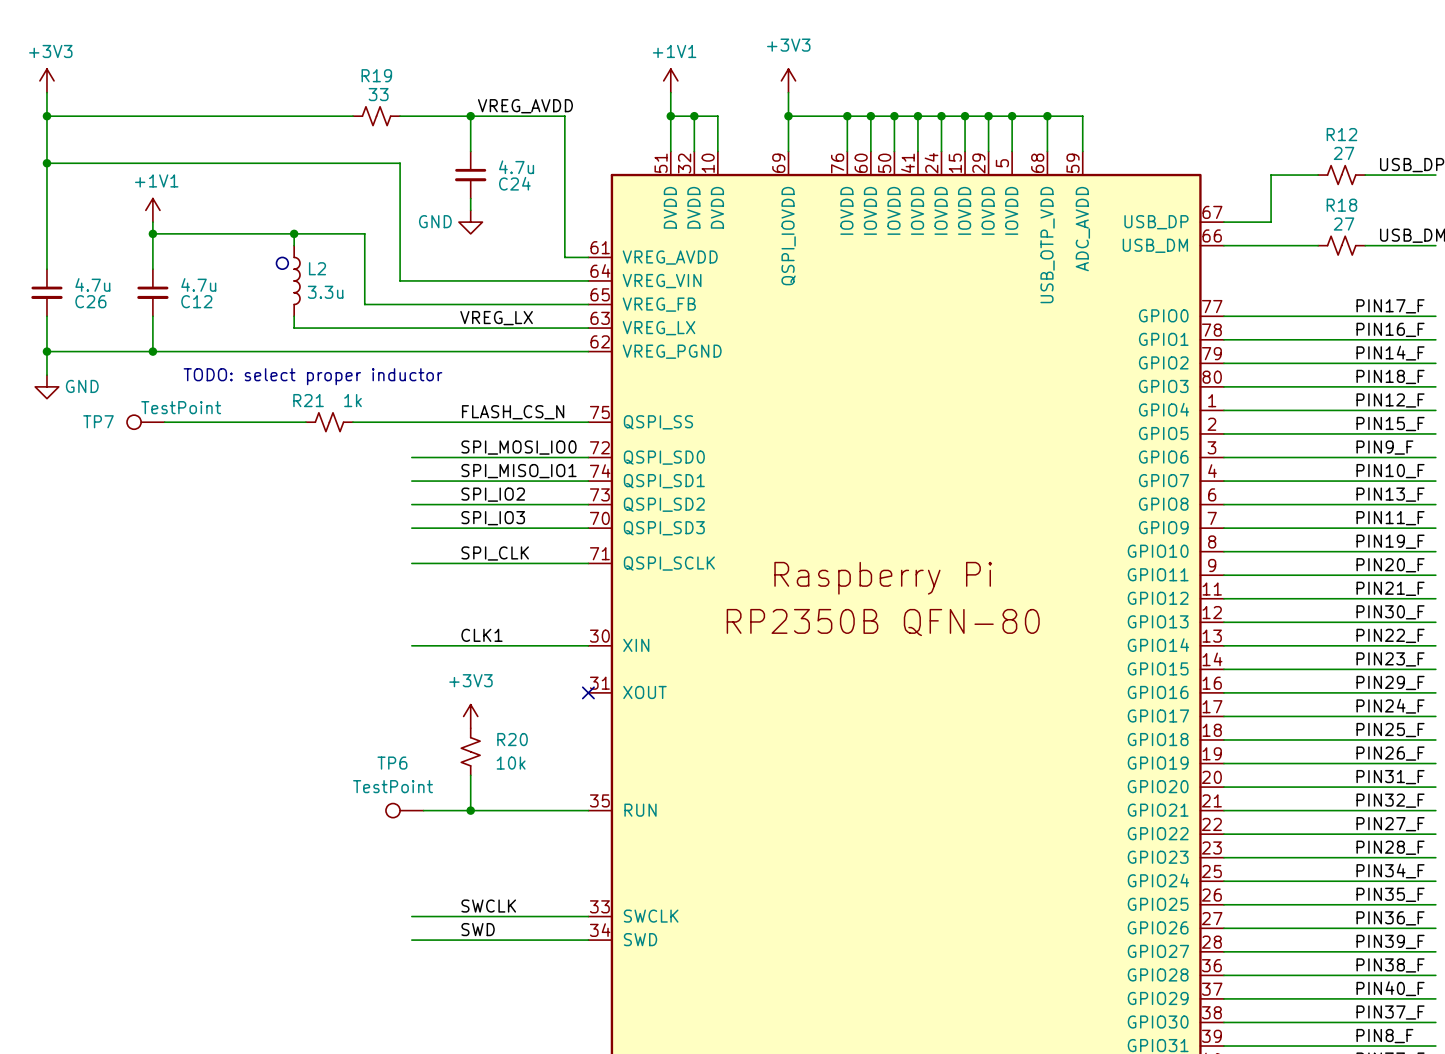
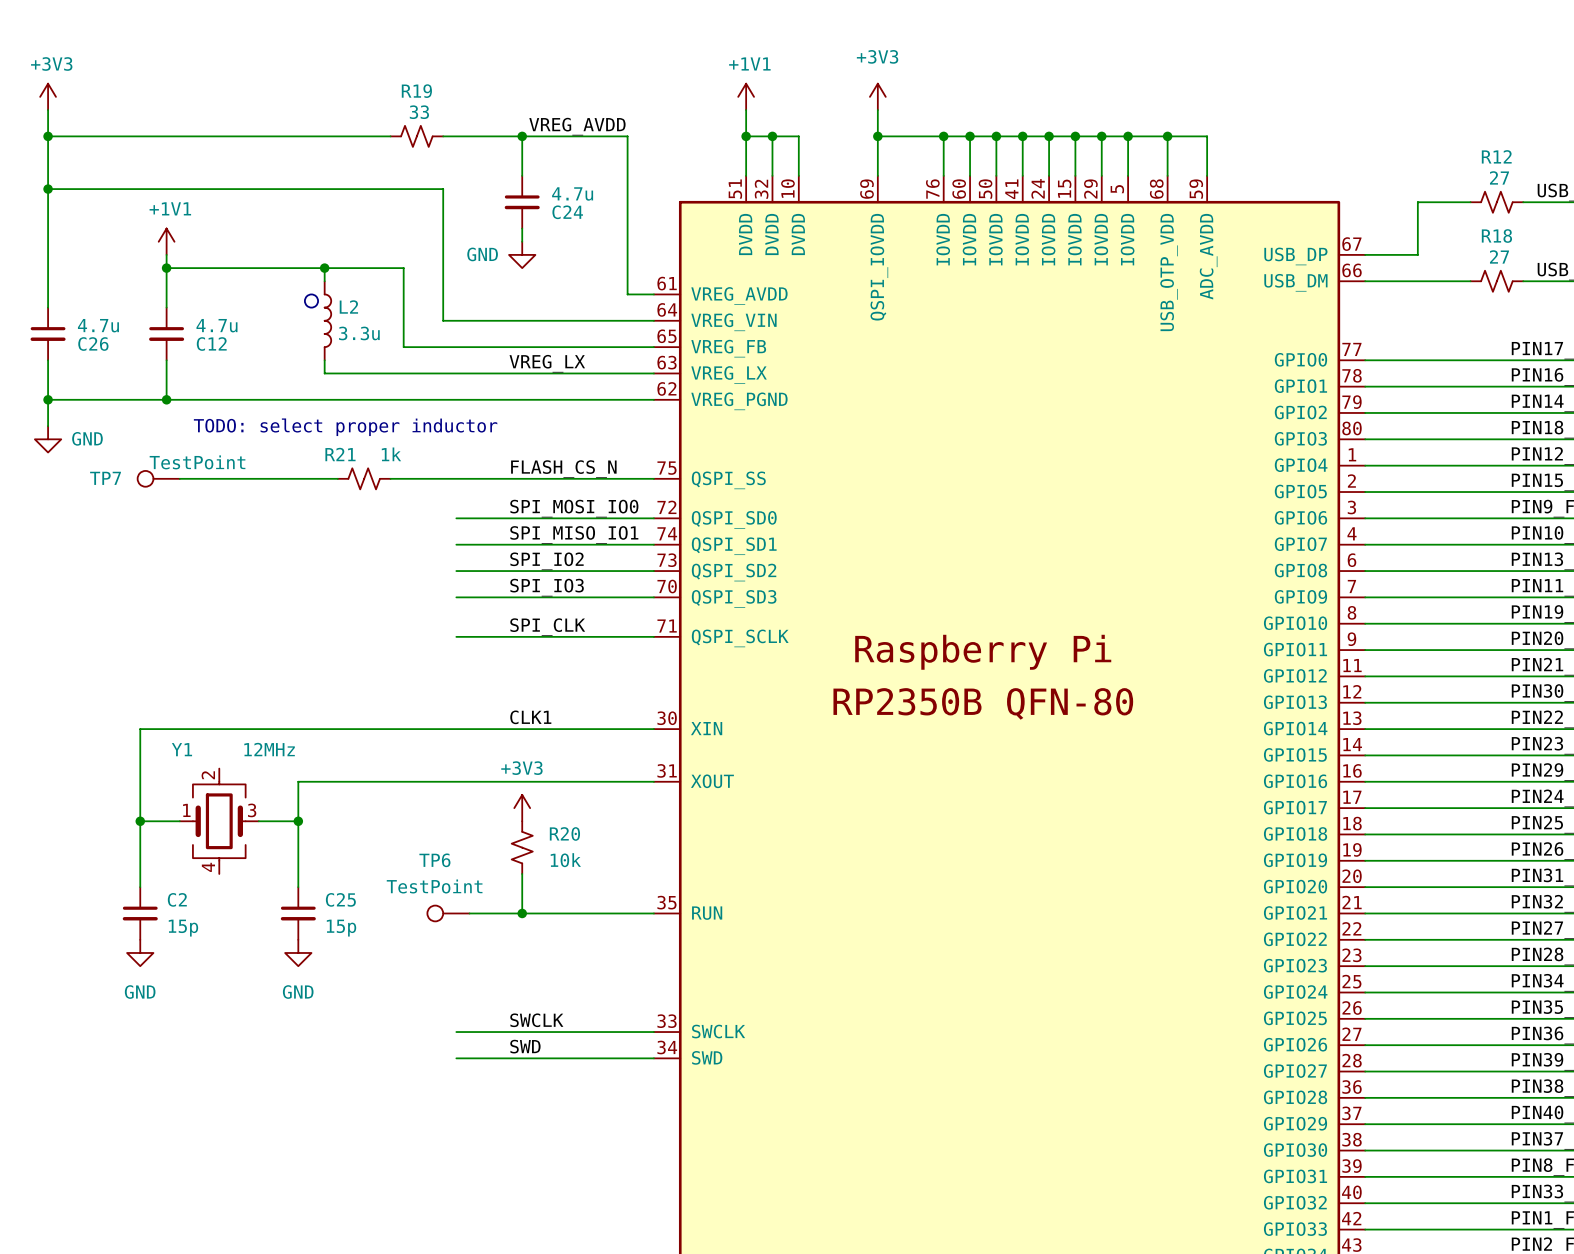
wire: none -> (456, 729) (140, 729) (140, 887)
wire: none -> (653, 781) (298, 781) (298, 887)
no-connect mark: (588, 692) -> none
wire: none -> (140, 821) (179, 821)
junction: none -> (140, 821)
Y1: none -> 12MHz (219, 821)
wire: none -> (258, 821) (298, 821)
junction: none -> (298, 821)
C2: none -> 15p (140, 913)
C25: none -> 15p (298, 913)
power symbol: none -> GND (140, 952)
power symbol: none -> GND (298, 952)

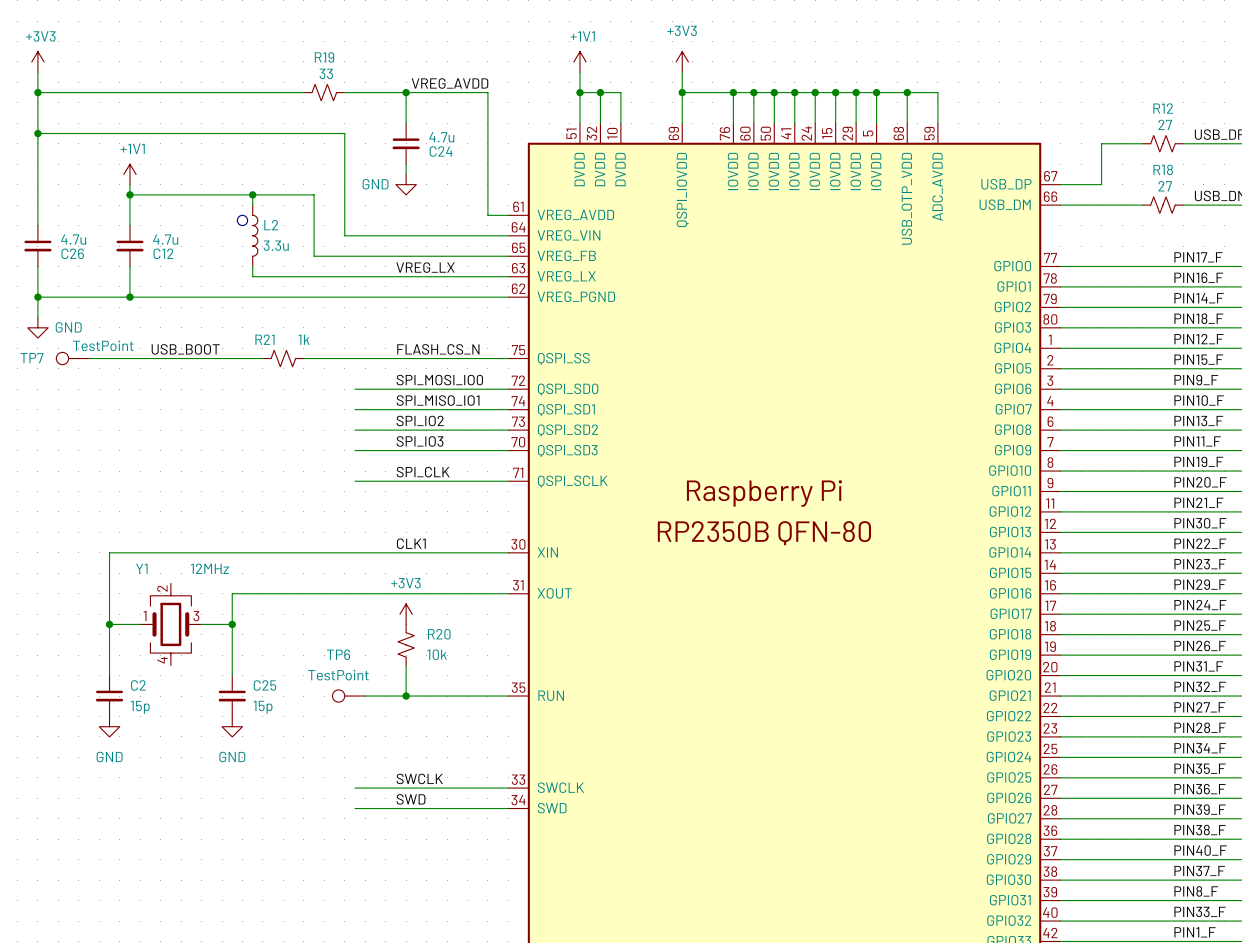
text: TODO: select proper inductor (345, 427) -> none
label: none -> USB_BOOT (185, 349)
wire: none -> (89, 358) (140, 358)
TP7 position: (158, 478) -> (72, 358)

